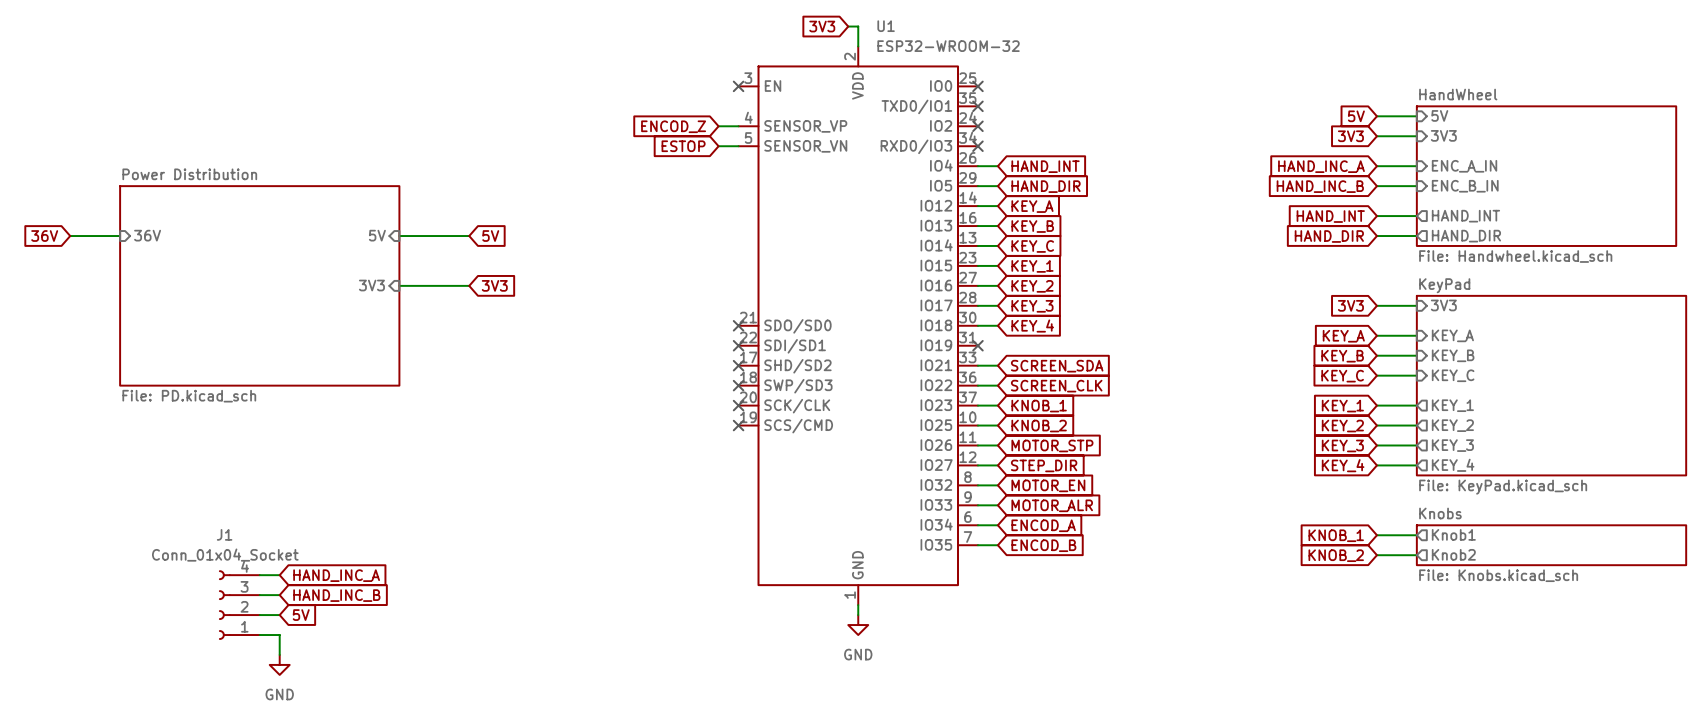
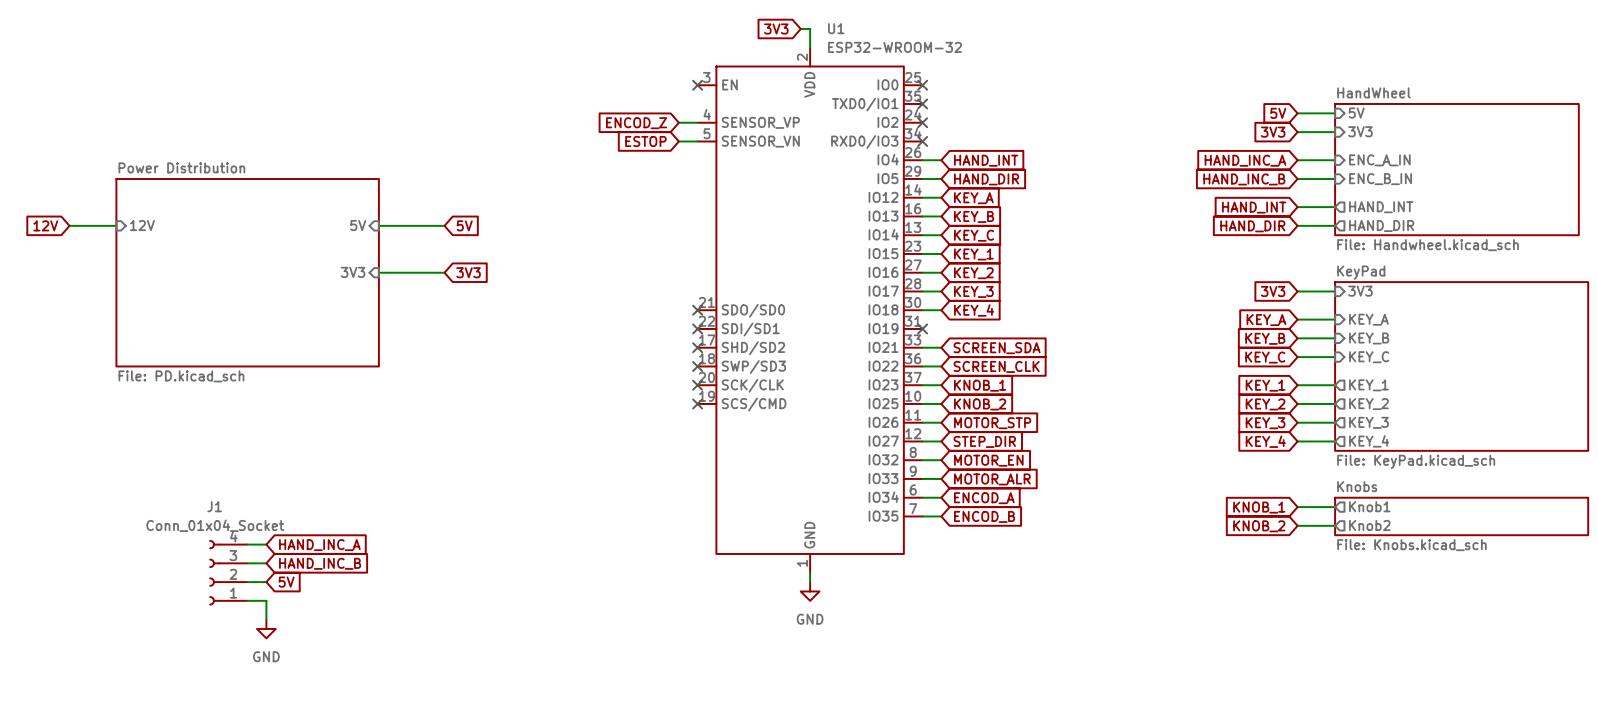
sheet pin: 36V (147, 235) -> 12V (142, 225)
global label: 36V (44, 236) -> 12V (45, 225)

